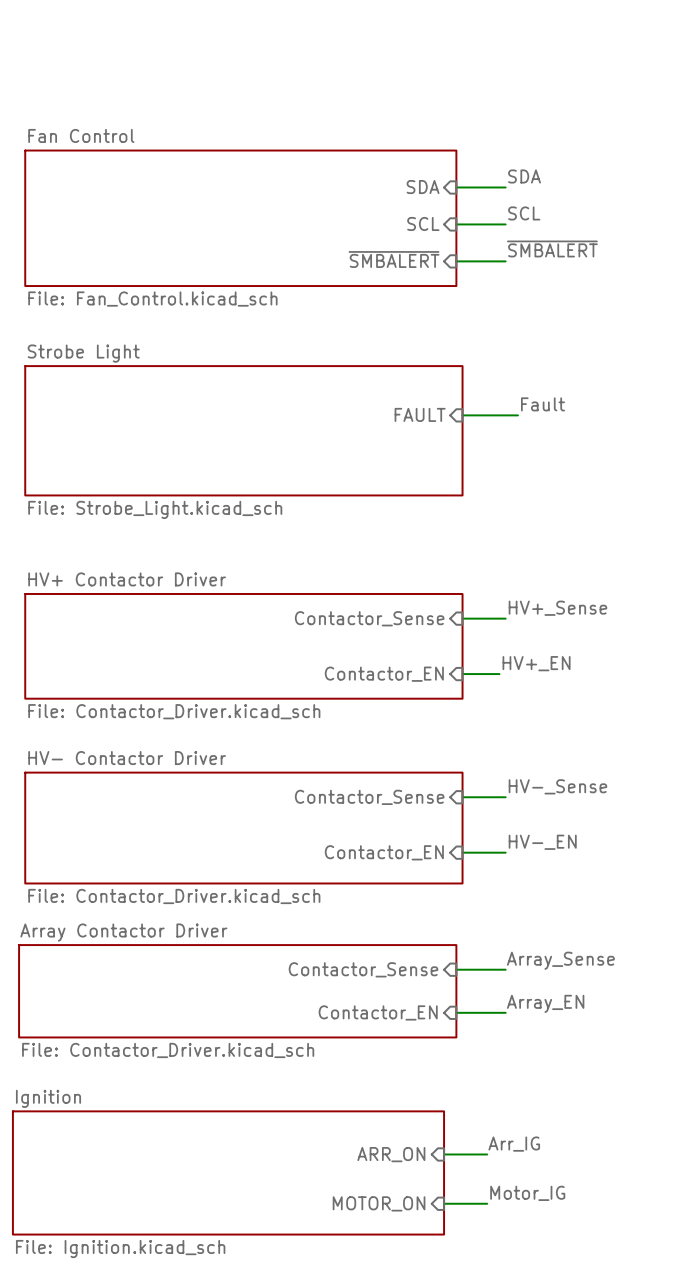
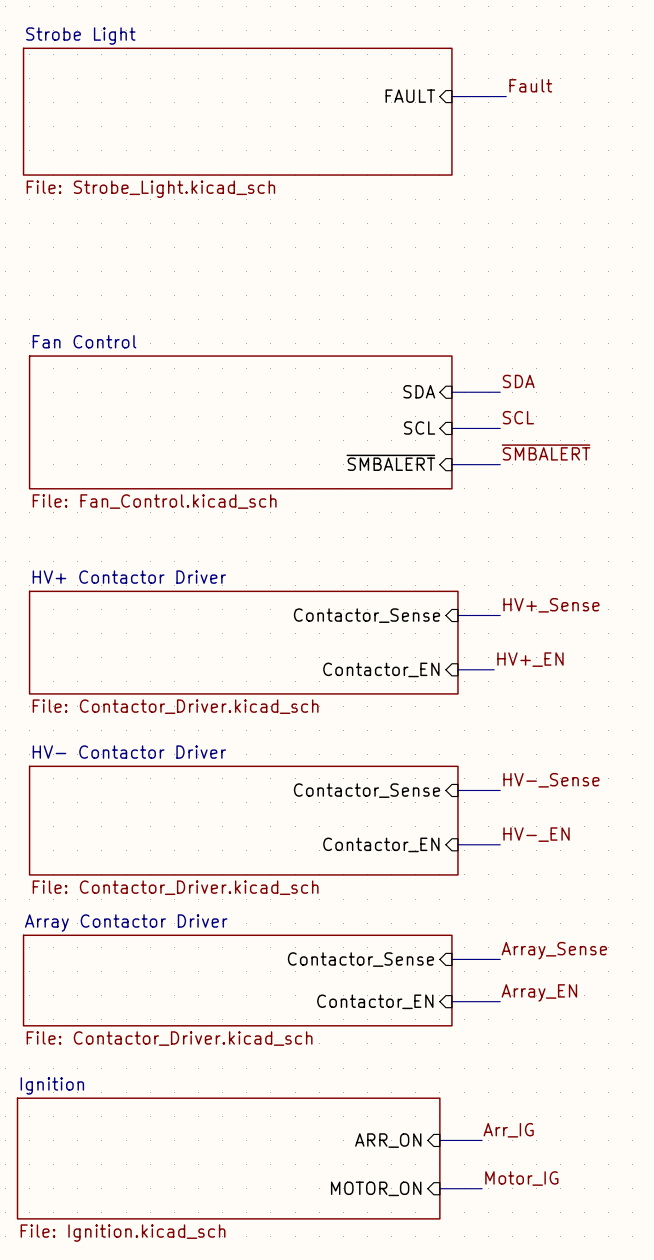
label: none -> Fault (530, 85)
sheet pin: none -> FAULT (410, 96)
wire: none -> (451, 96) (506, 96)
sheet Strobe Light: none -> File: Strobe_Light.kicad_sch (237, 111)
label position: SDA (524, 176) -> SDA (518, 381)
sheet pin position: SDA (423, 187) -> SDA (419, 391)
wire: (456, 187) (505, 187) -> (451, 392) (500, 392)
label position: SCL (524, 213) -> SCL (518, 417)
sheet Fan Control position: (240, 218) -> (240, 422)
sheet pin position: SCL (423, 223) -> SCL (419, 427)
wire: (456, 224) (505, 224) -> (451, 428) (500, 428)
label position: ~{SMBALERT} (552, 248) -> ~{SMBALERT} (546, 452)
sheet pin position: ~{SMBALERT} (394, 259) -> ~{SMBALERT} (390, 462)
wire: (456, 261) (505, 261) -> (451, 464) (500, 464)
label: Fault (542, 404) -> none
sheet pin: FAULT (420, 414) -> none
wire: (462, 415) (517, 415) -> none
sheet Strobe Light: File: Strobe_Light.kicad_sch (243, 430) -> none

